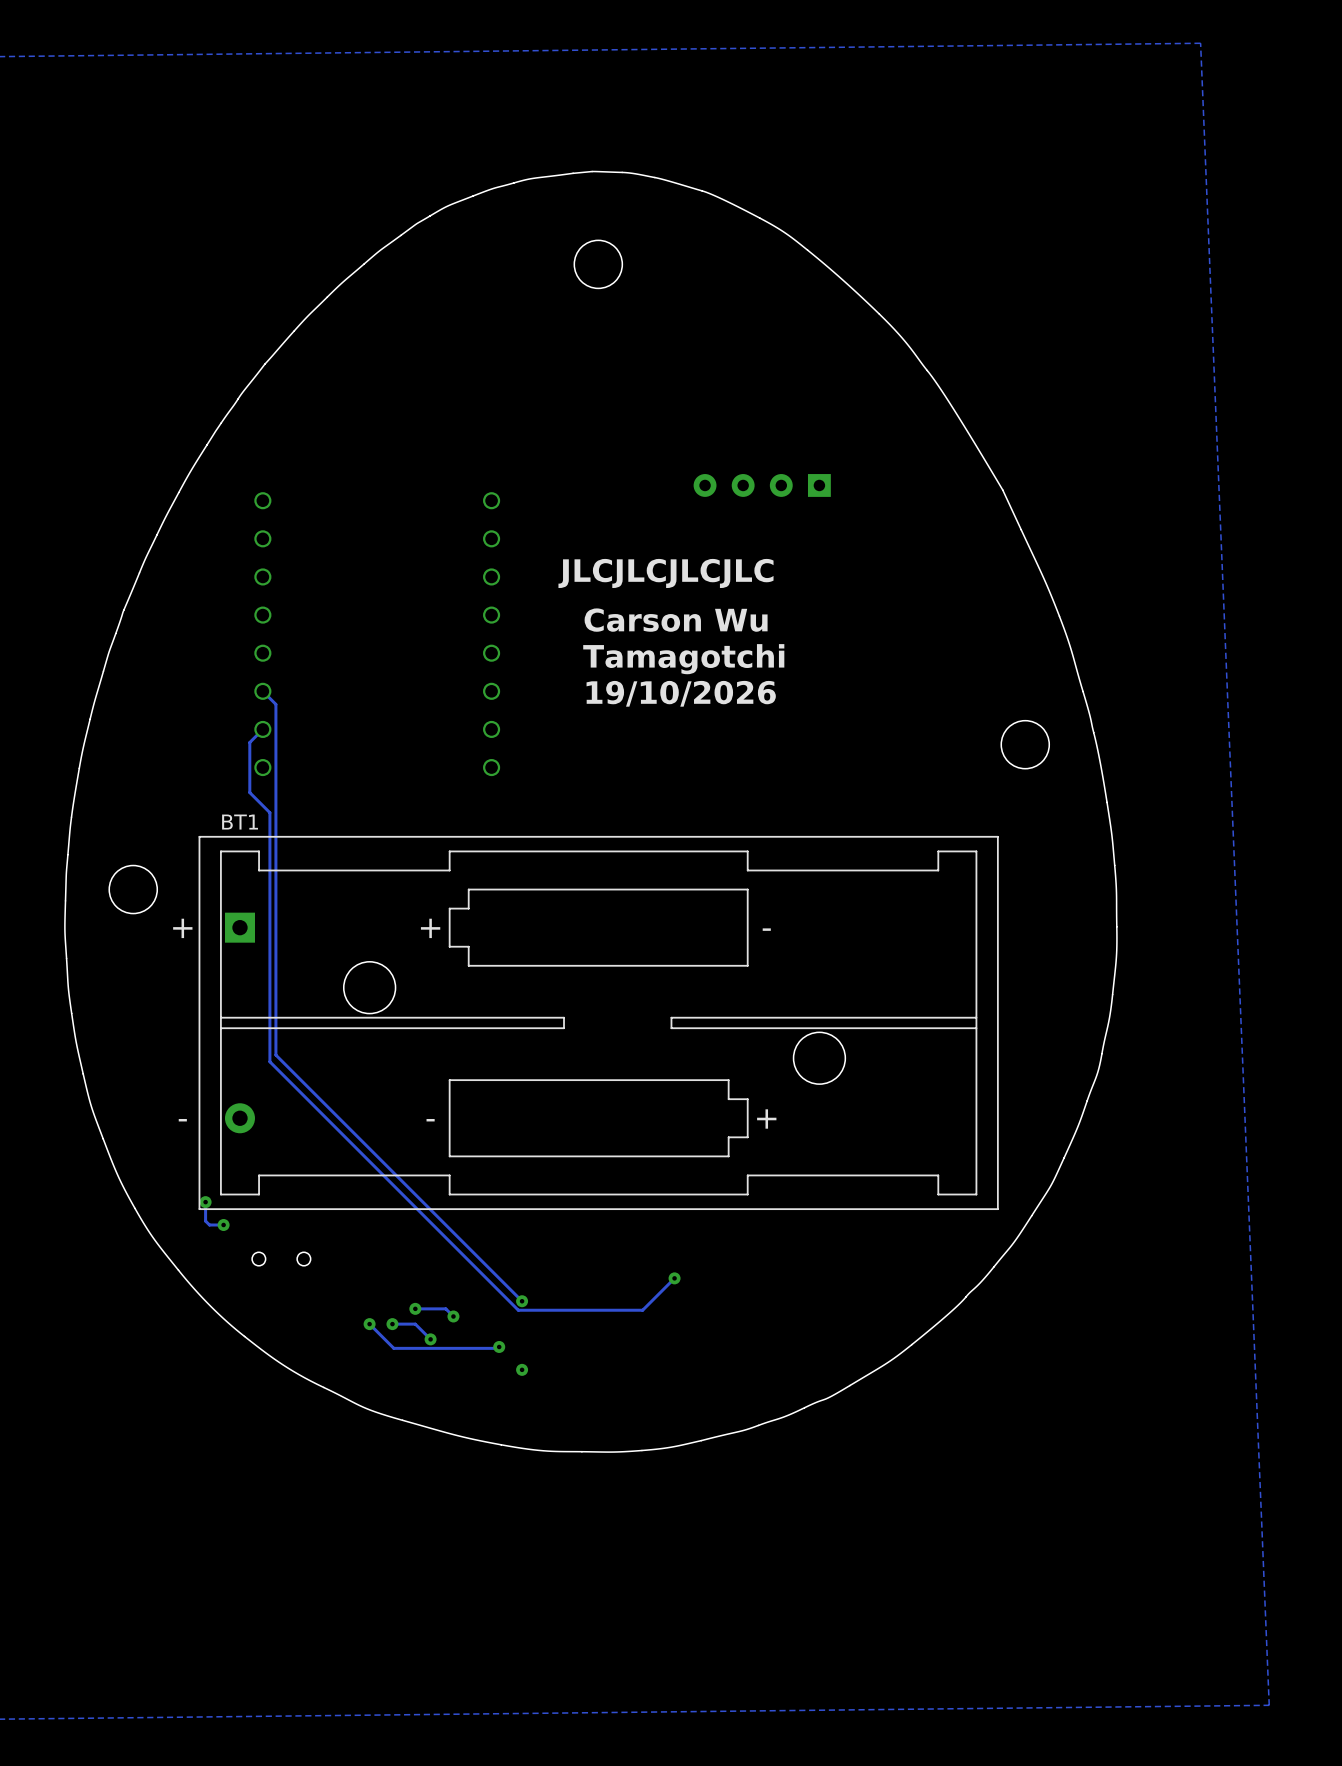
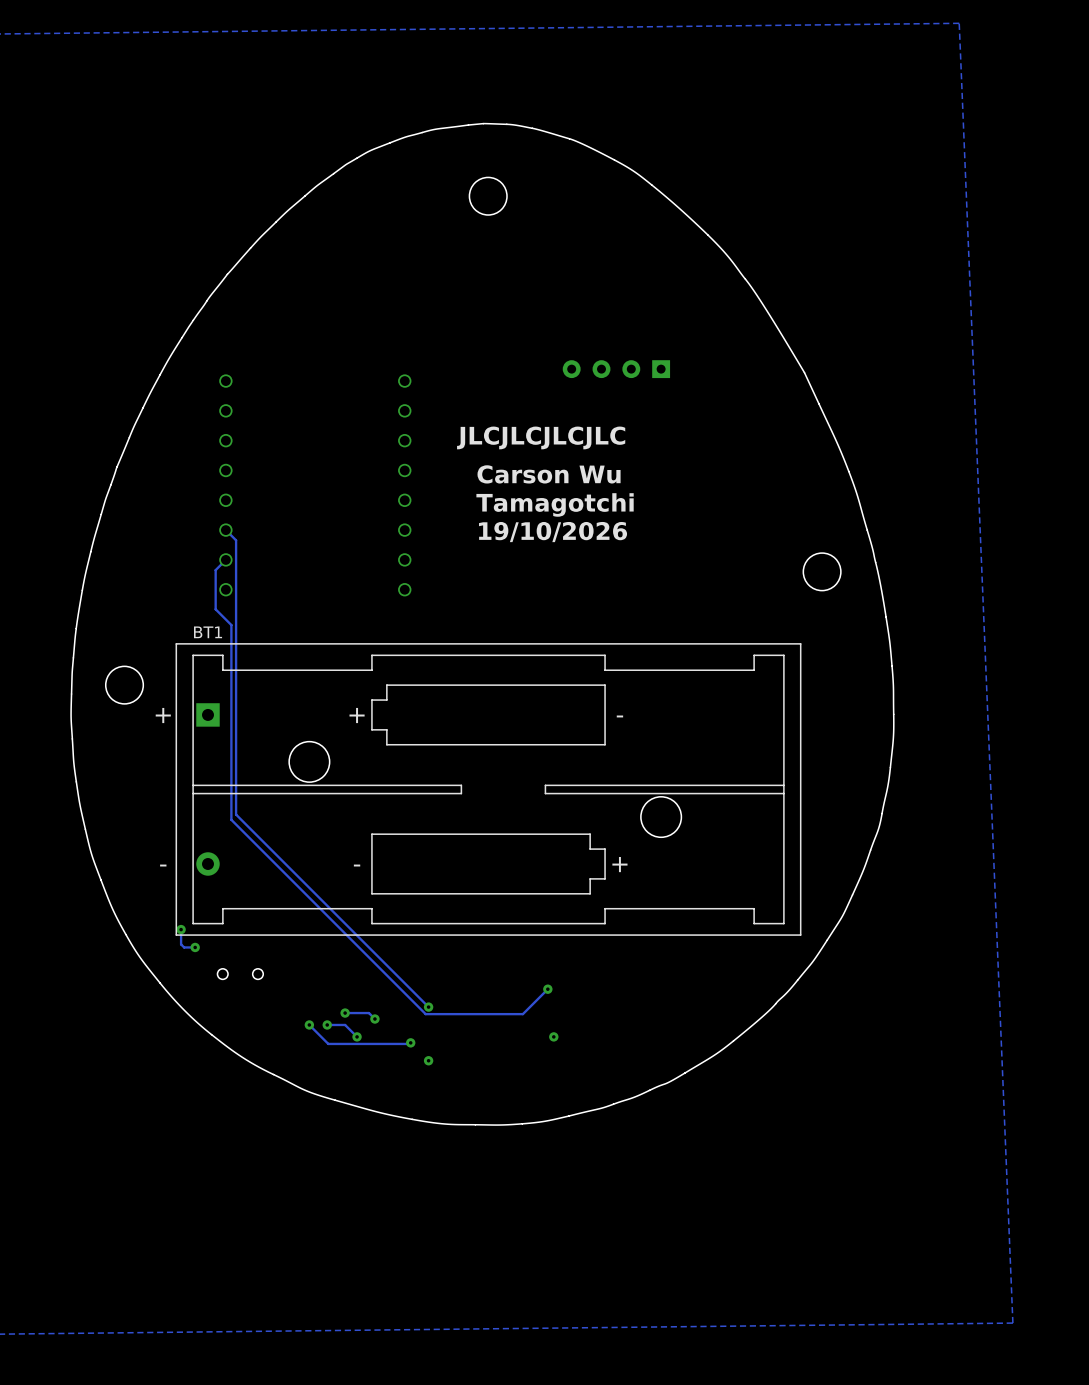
via: none -> (553, 1036)

